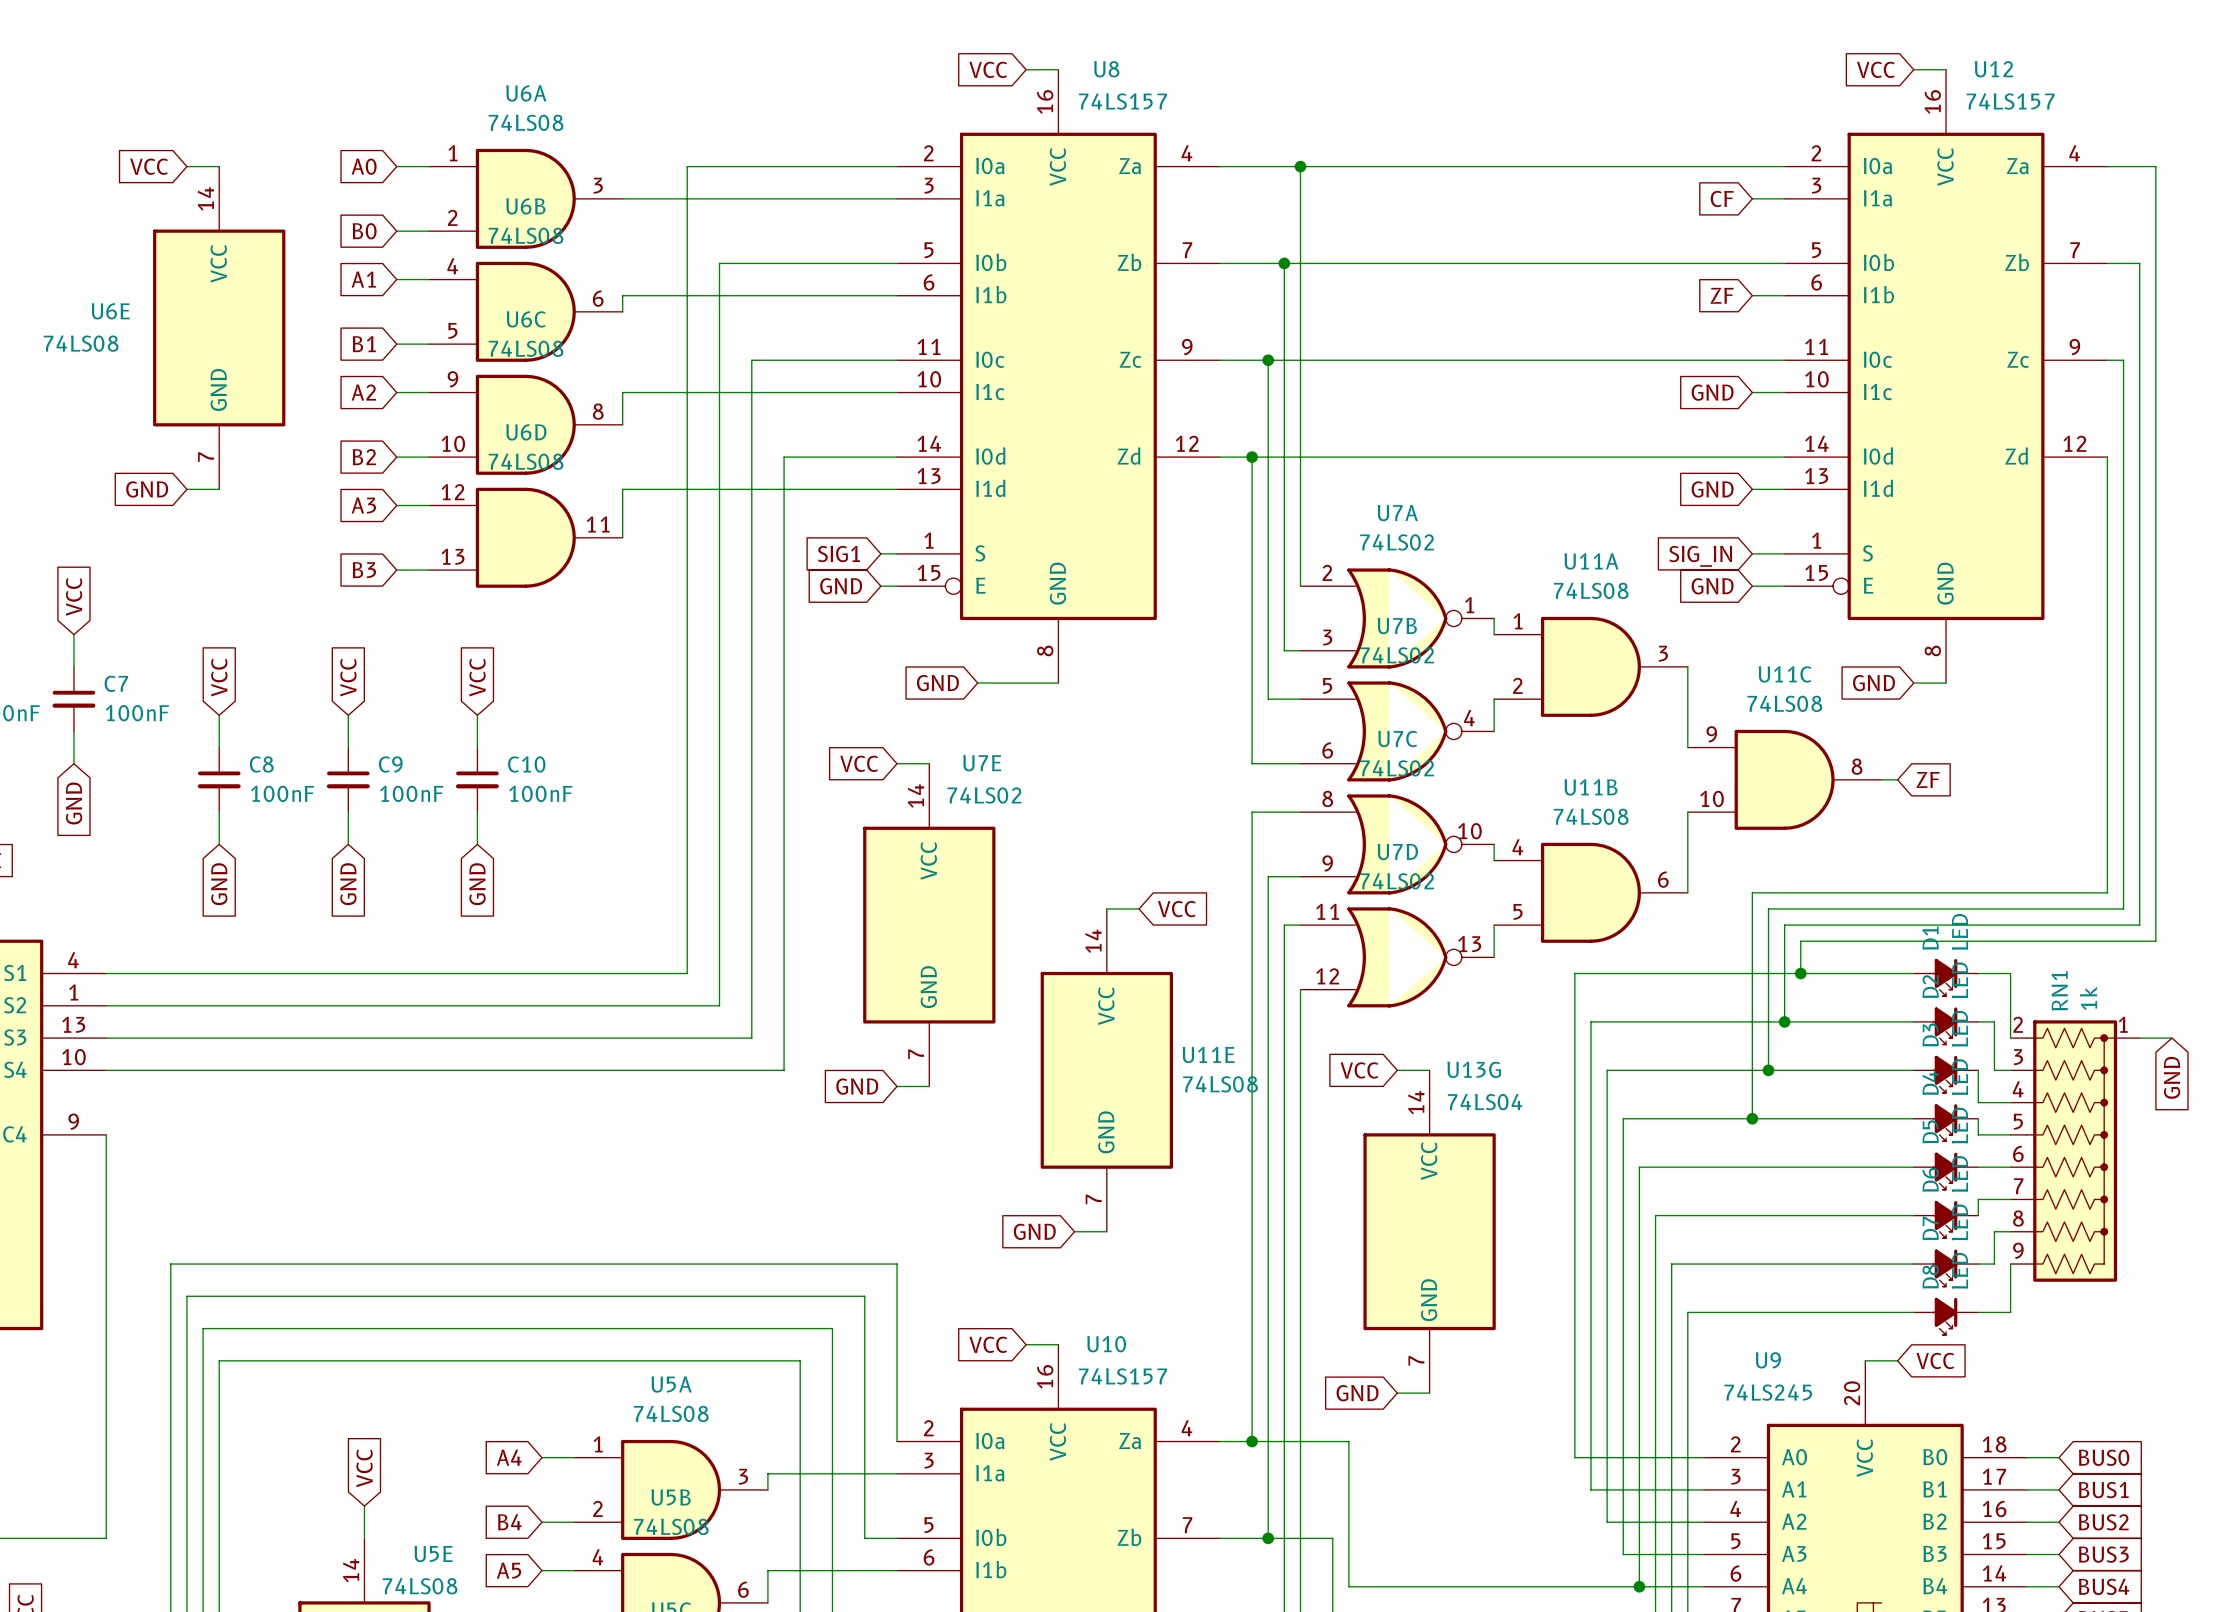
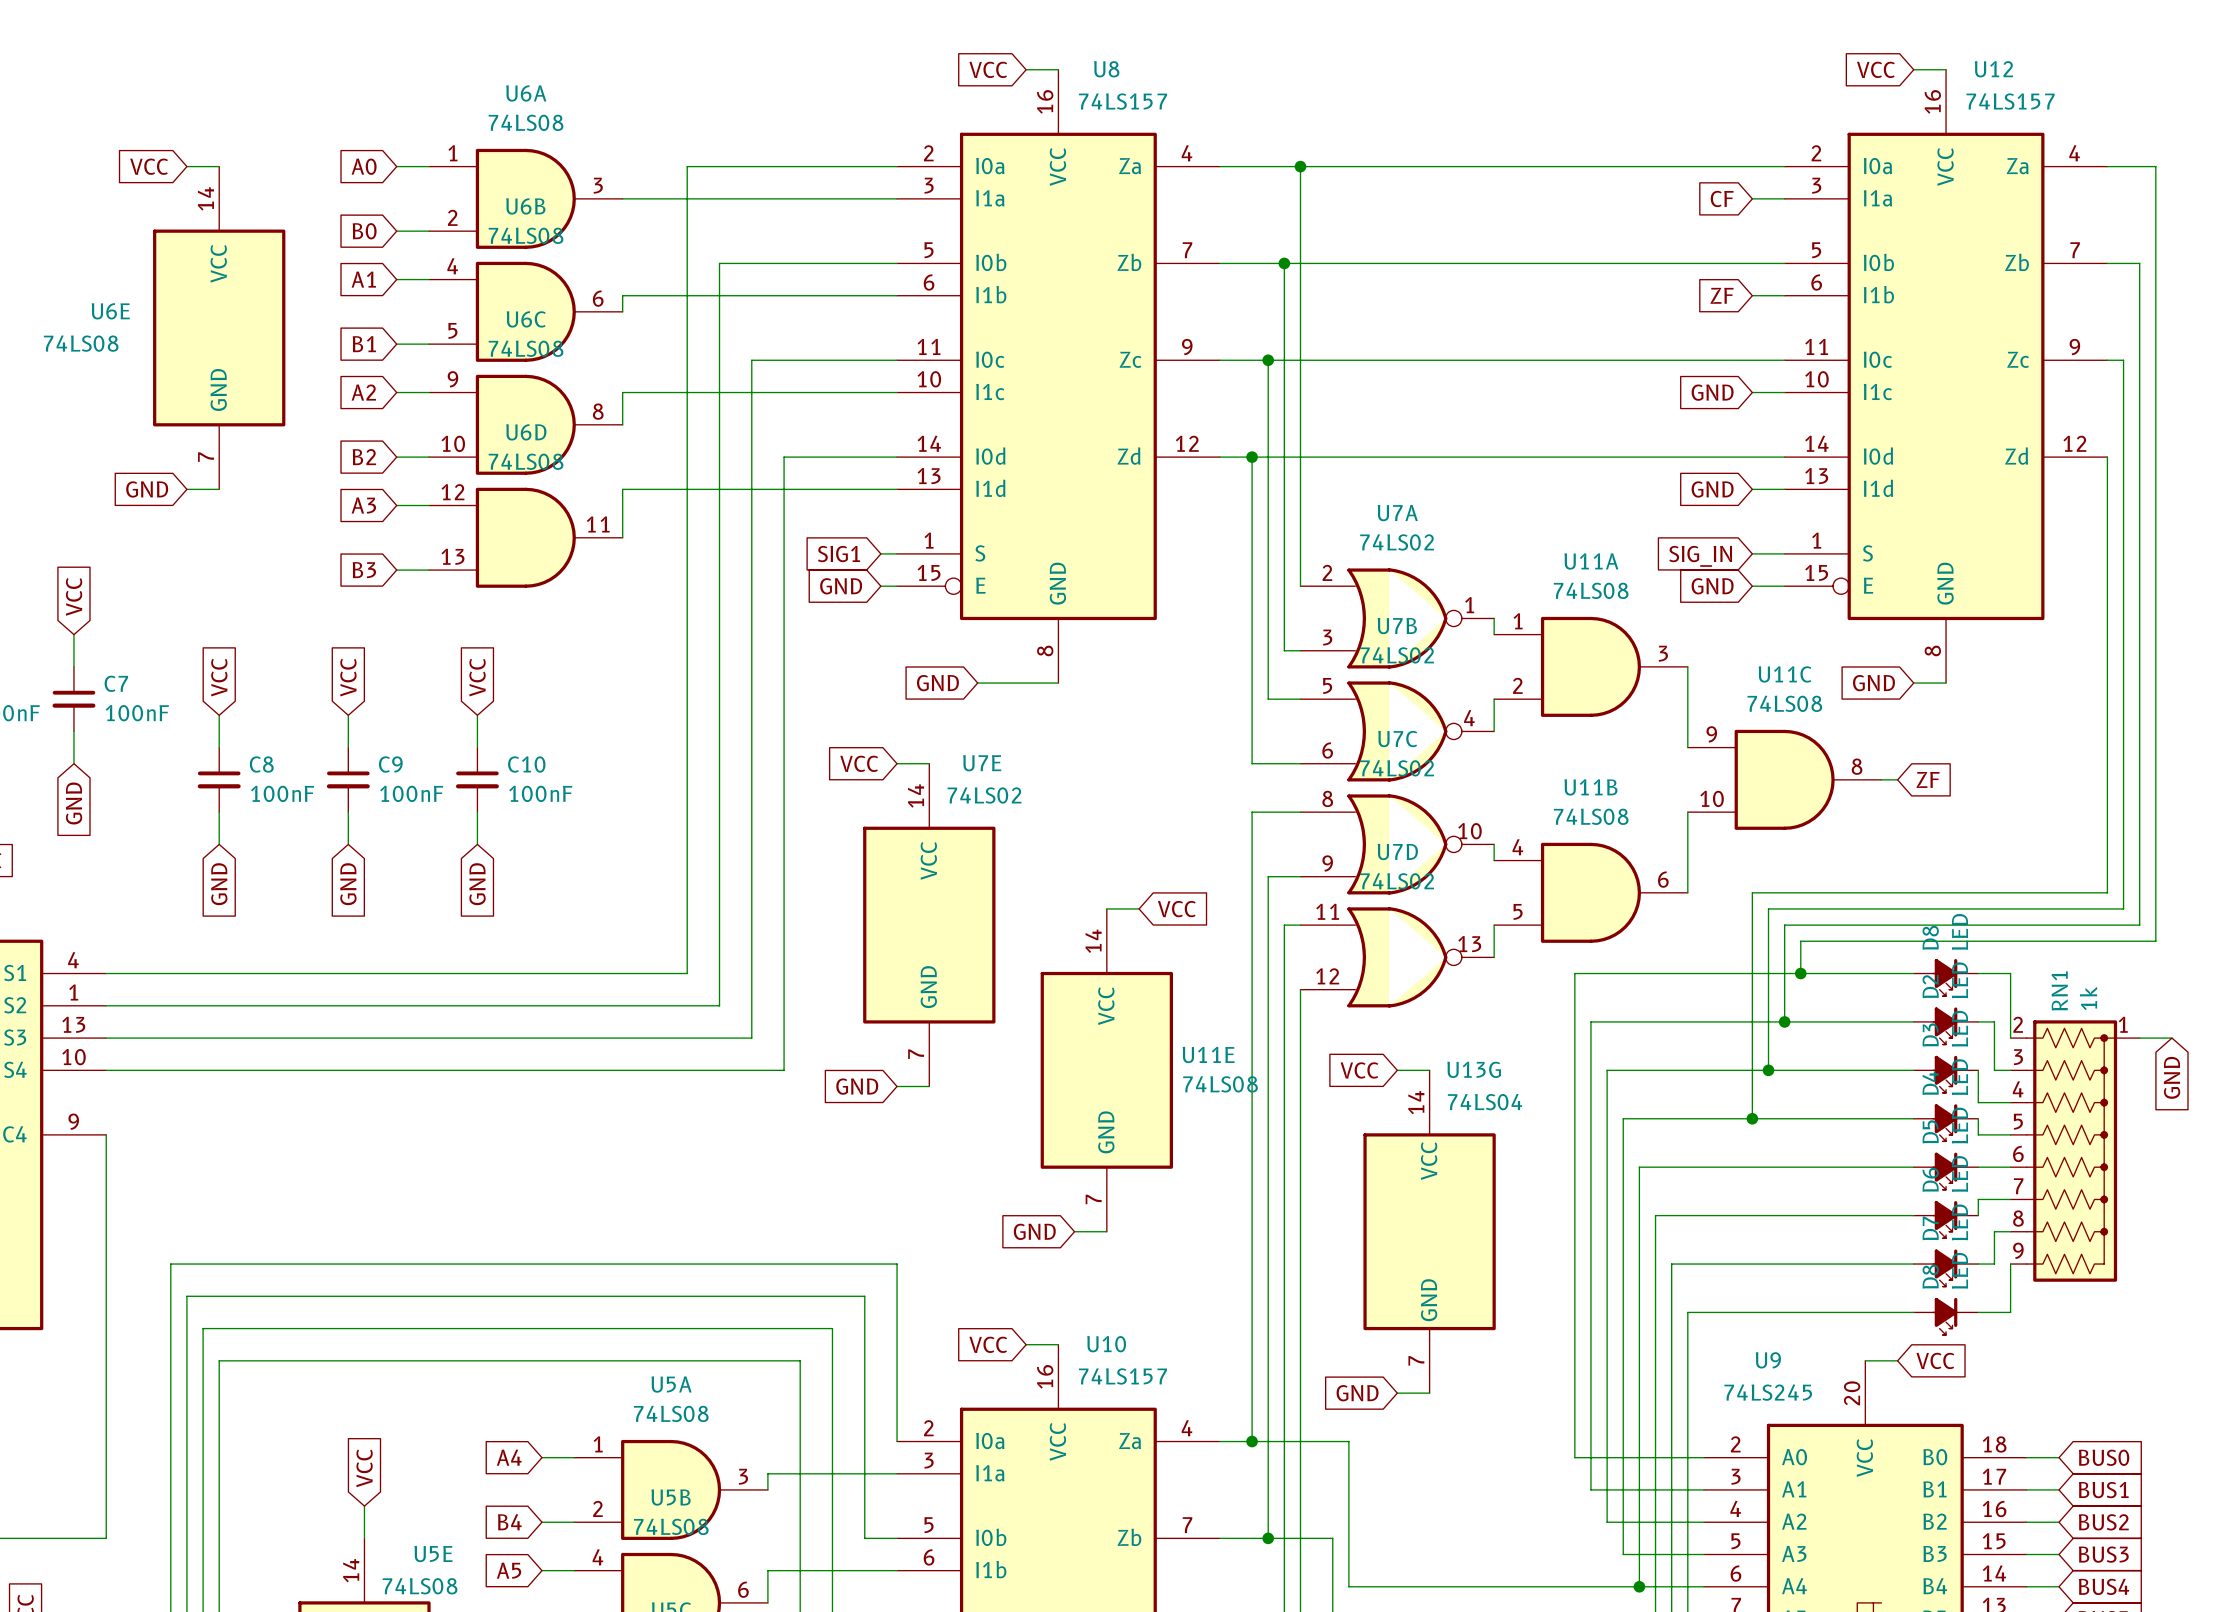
D1 name: D1 (1930, 938) -> D8 (1930, 937)

